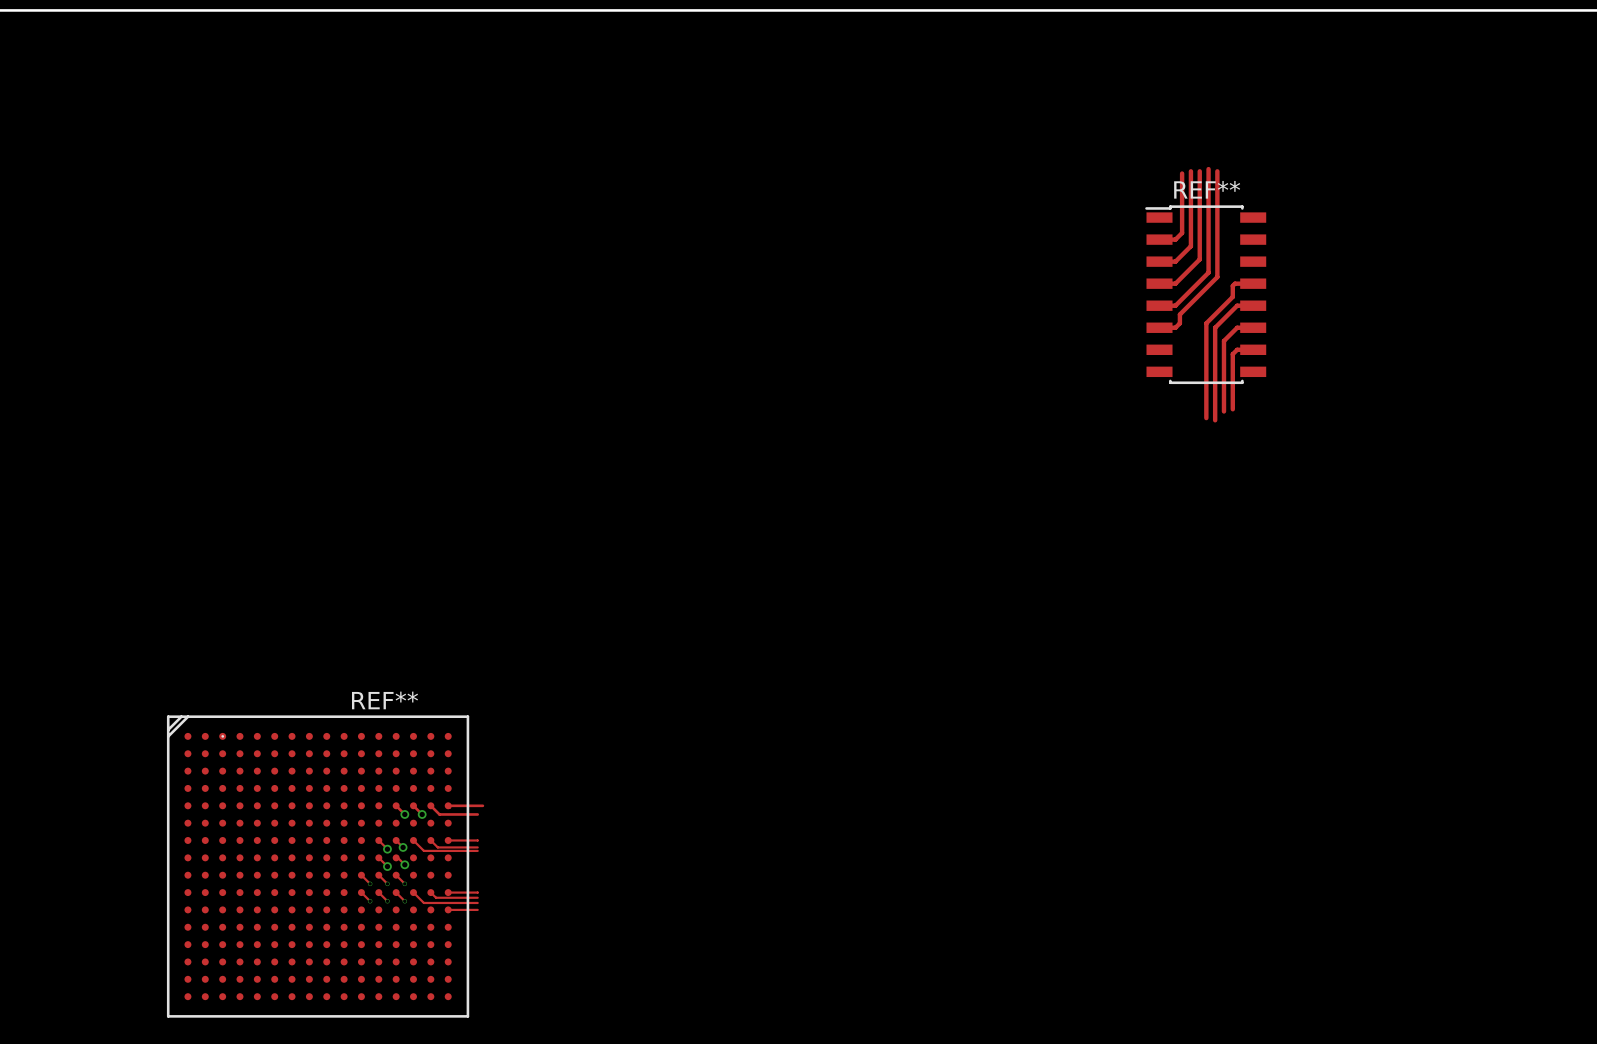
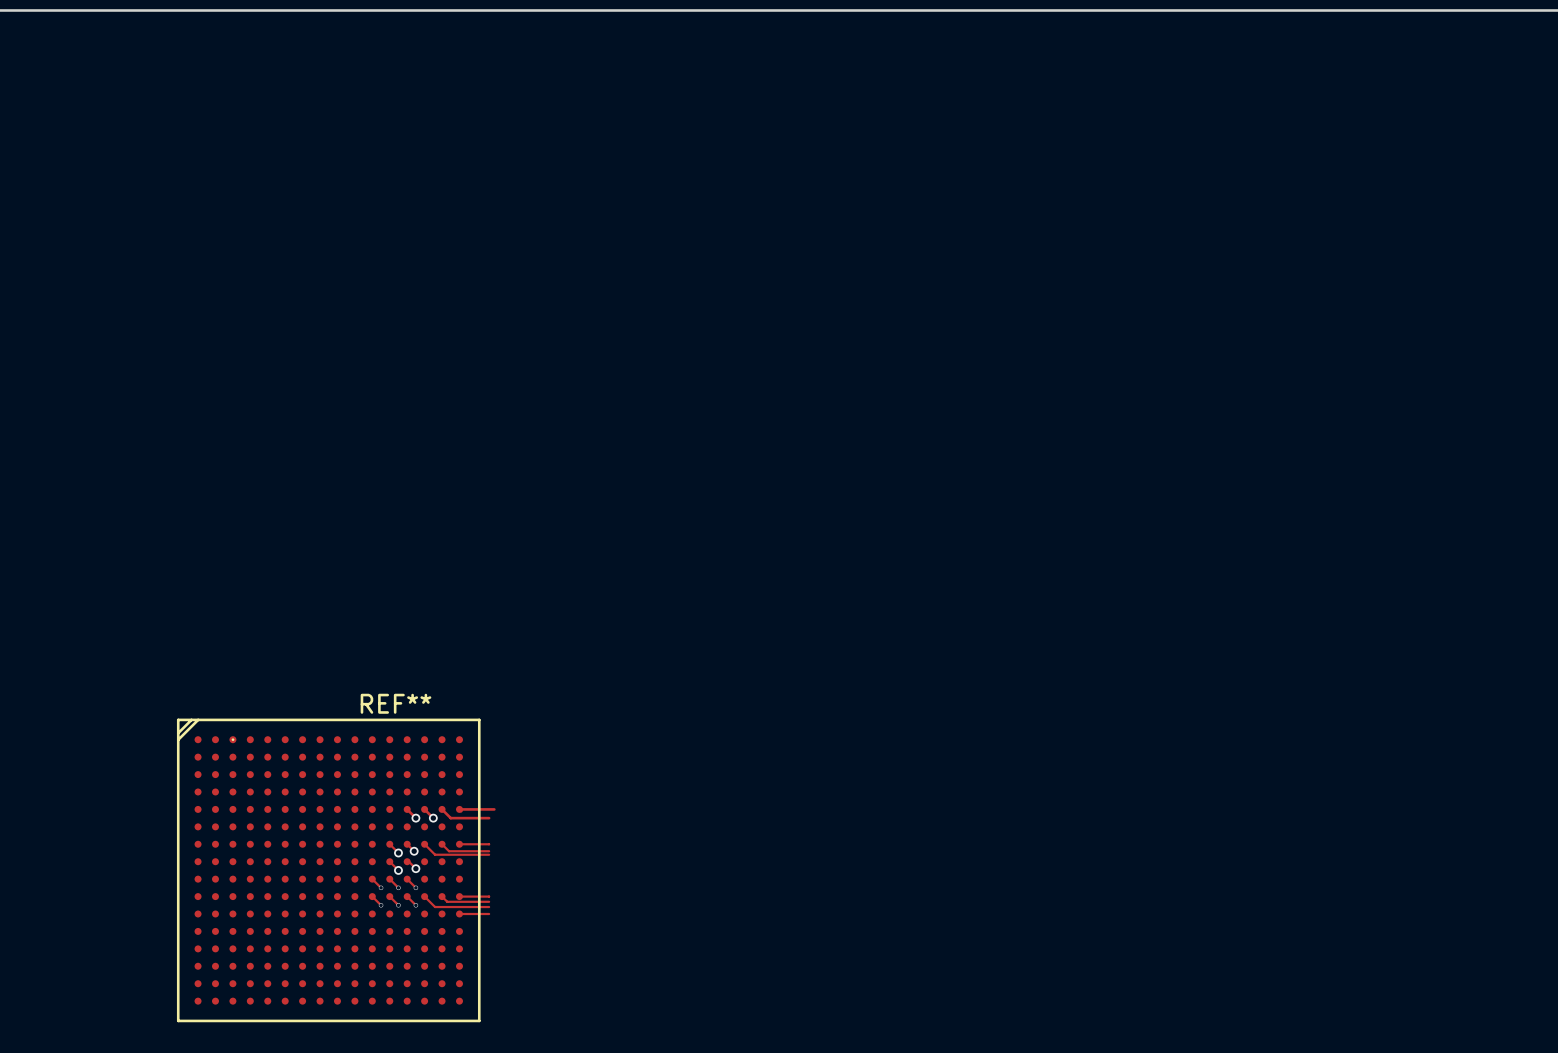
track: (1208, 169) (1208, 272) (1175, 305) (1159, 305) -> none
track: (1190, 171) (1190, 246) (1175, 261) (1159, 261) -> none
track: (1199, 171) (1199, 259) (1175, 283) (1159, 283) -> none
track: (1217, 171) (1217, 277) (1179, 314) (1179, 323) (1175, 327) (1159, 327) -> none
track: (1182, 173) (1182, 233) (1175, 239) (1159, 239) -> none
track: (1253, 283) (1235, 283) (1232, 285) (1232, 296) (1206, 323) (1206, 418) -> none
REF**: (1205, 294) -> none
track: (1253, 305) (1237, 305) (1215, 327) (1215, 420) -> none
track: (1253, 327) (1237, 327) (1223, 340) (1223, 411) -> none
track: (1253, 349) (1237, 349) (1232, 354) (1232, 409) -> none

